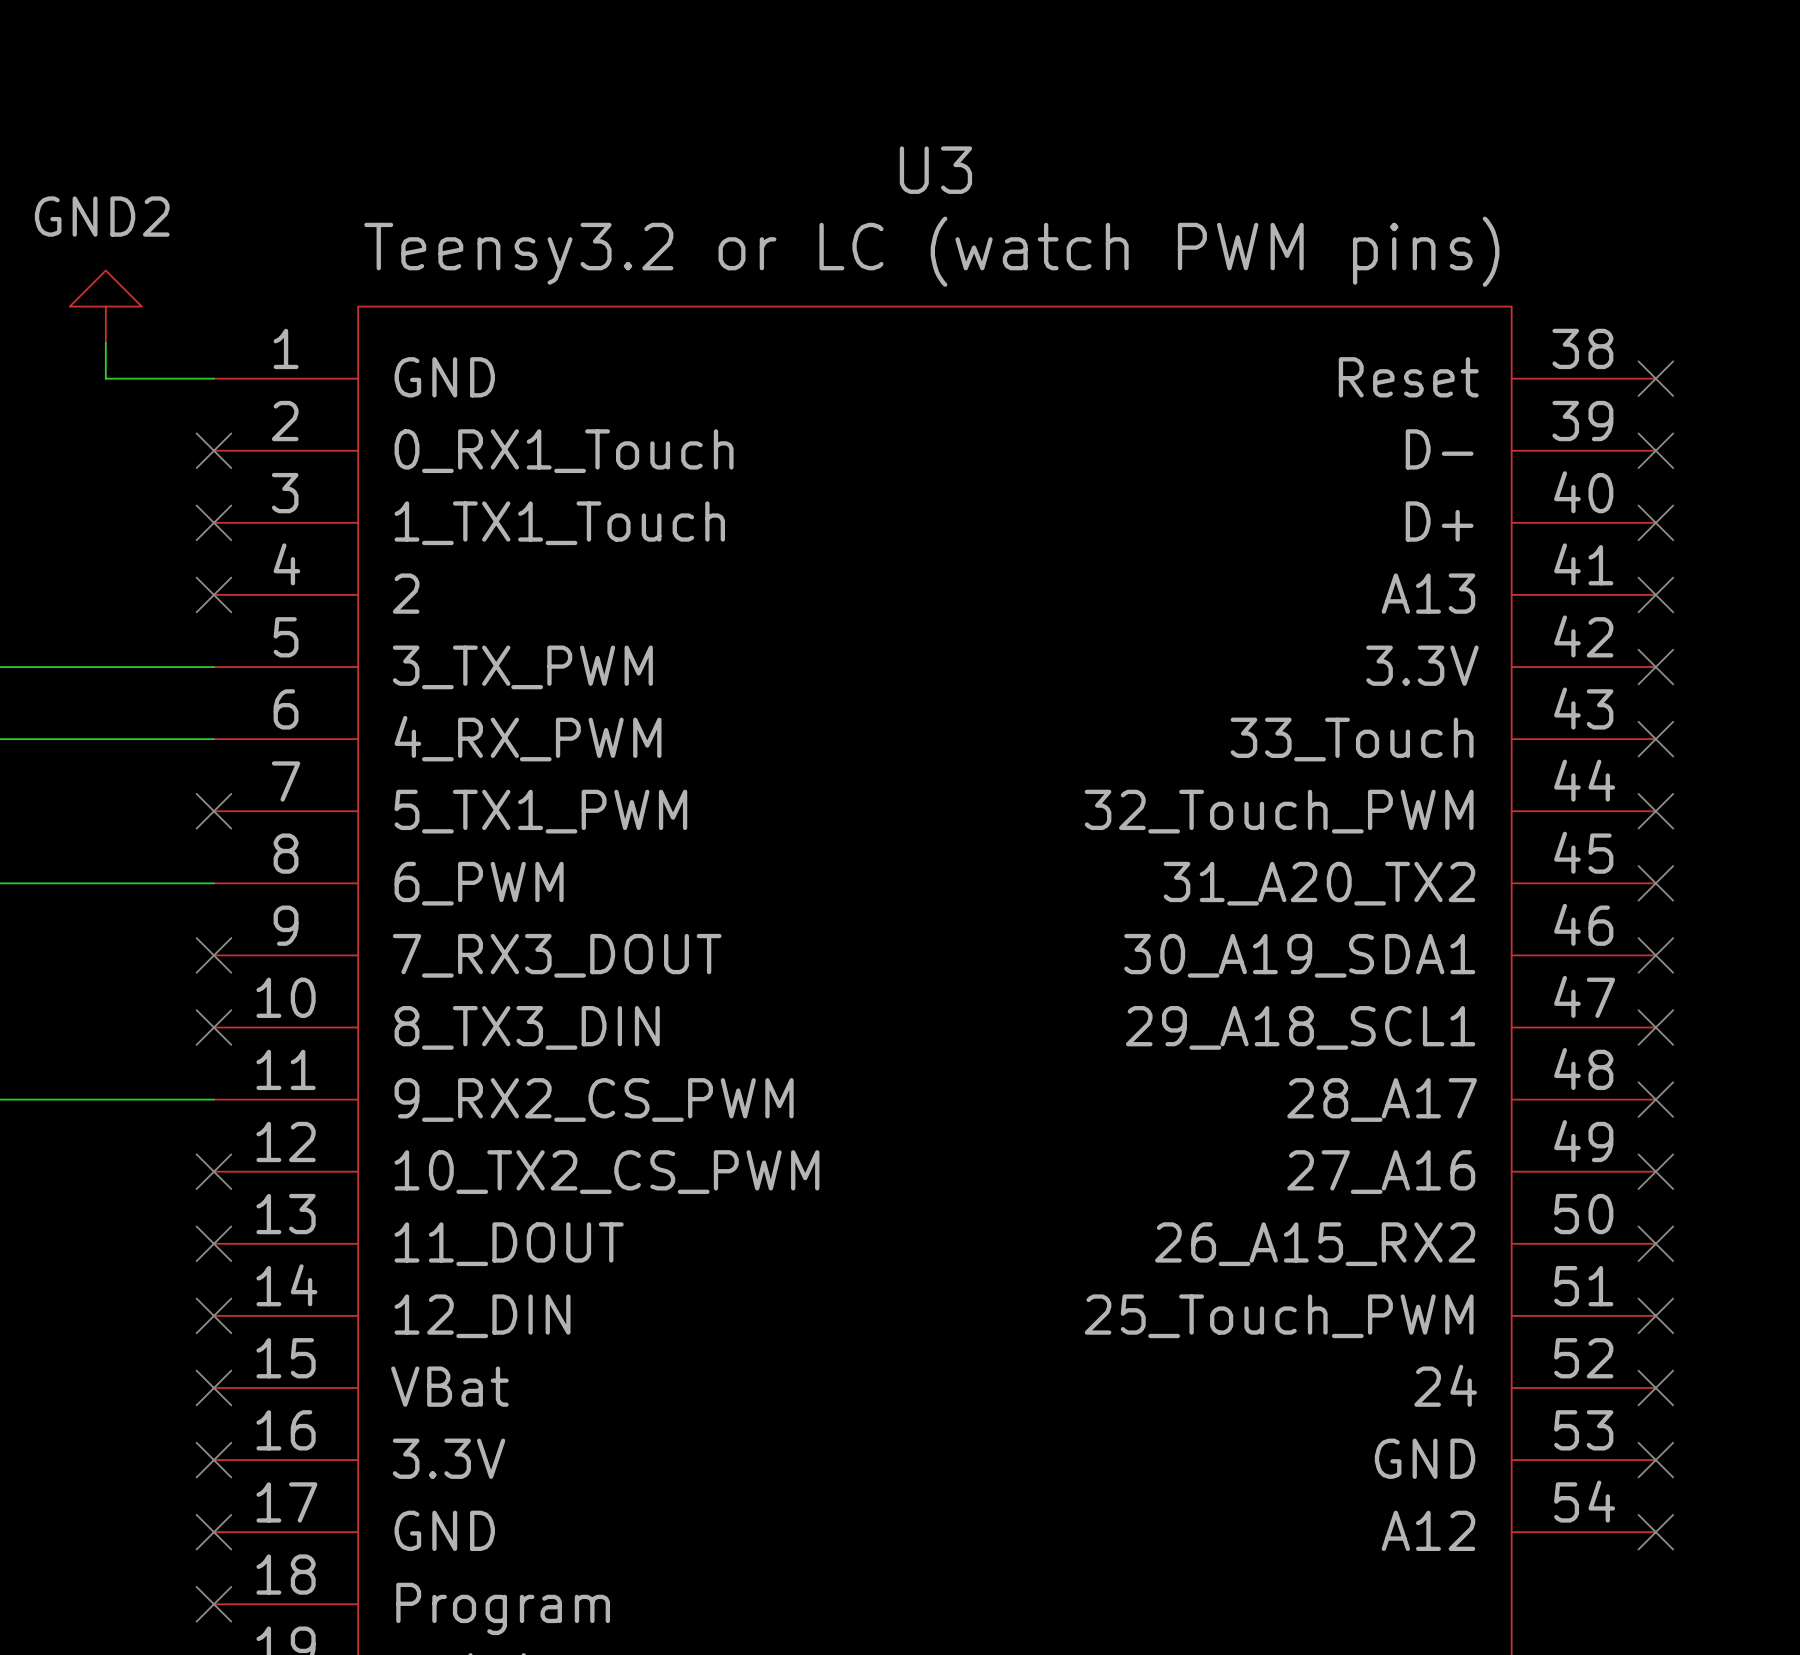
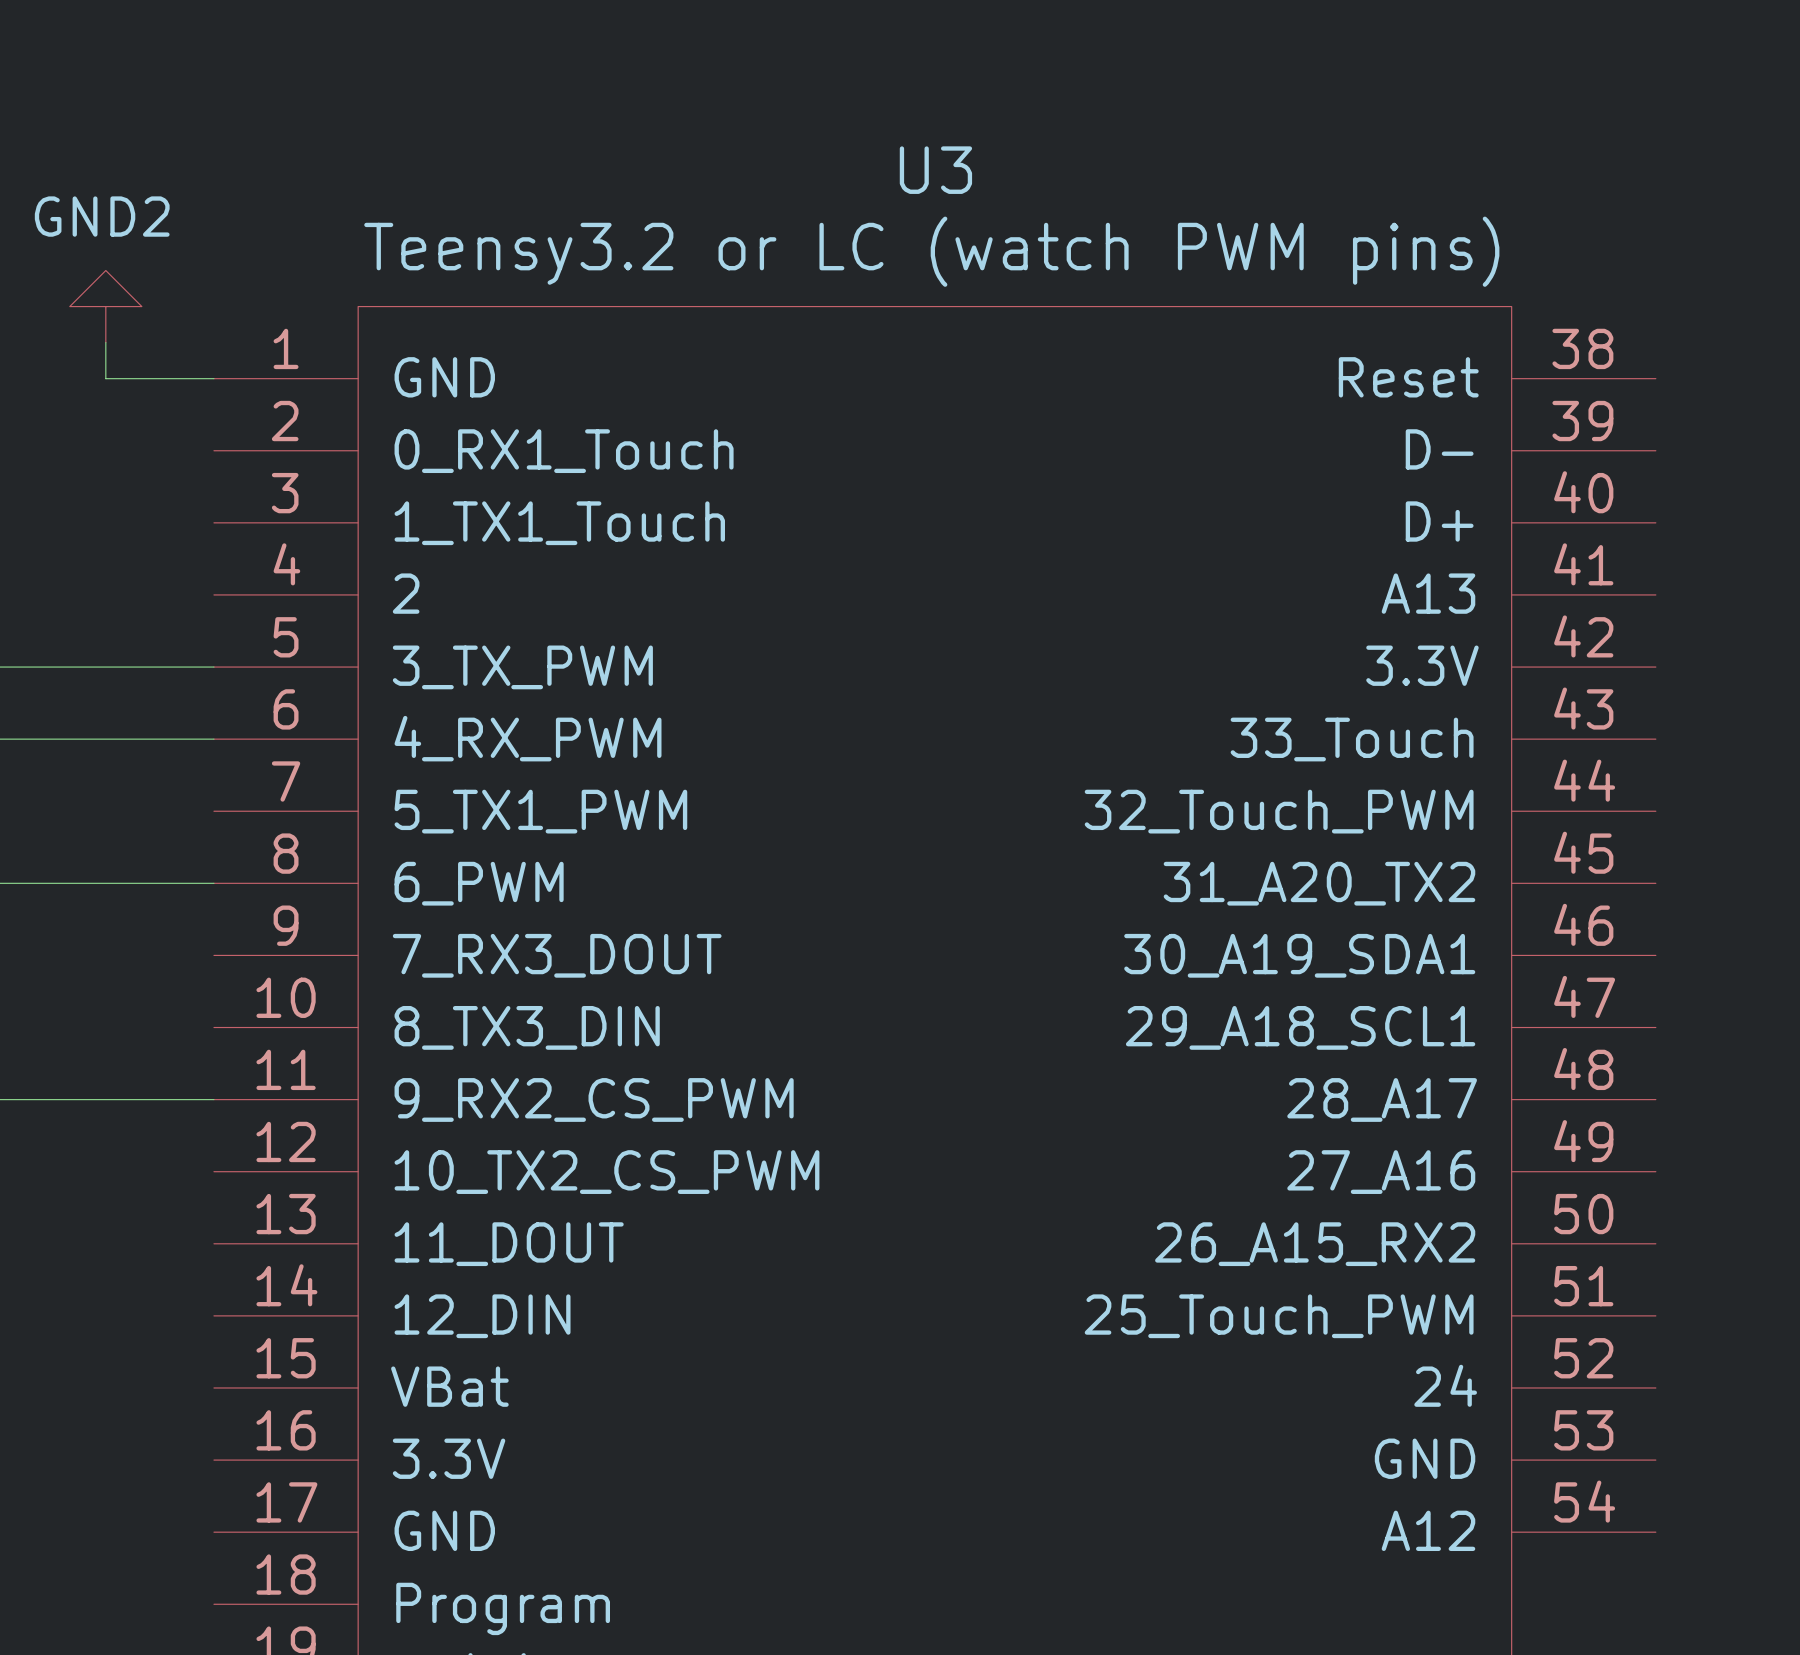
no-connect mark: (1655, 378) -> none
no-connect mark: (213, 450) -> none
no-connect mark: (1655, 450) -> none
no-connect mark: (213, 522) -> none
no-connect mark: (1655, 522) -> none
no-connect mark: (213, 594) -> none
no-connect mark: (1655, 594) -> none
no-connect mark: (1655, 667) -> none
no-connect mark: (1655, 739) -> none
no-connect mark: (213, 811) -> none
no-connect mark: (1655, 811) -> none
no-connect mark: (1655, 883) -> none
no-connect mark: (213, 955) -> none
no-connect mark: (1655, 955) -> none
no-connect mark: (213, 1027) -> none
no-connect mark: (1655, 1027) -> none
no-connect mark: (1655, 1099) -> none
no-connect mark: (213, 1171) -> none
no-connect mark: (1655, 1171) -> none
no-connect mark: (213, 1243) -> none
no-connect mark: (1655, 1243) -> none
no-connect mark: (213, 1315) -> none
no-connect mark: (1655, 1315) -> none
no-connect mark: (213, 1387) -> none
no-connect mark: (1655, 1387) -> none
no-connect mark: (213, 1460) -> none
no-connect mark: (1655, 1460) -> none
no-connect mark: (213, 1532) -> none
no-connect mark: (1655, 1532) -> none
no-connect mark: (213, 1604) -> none

